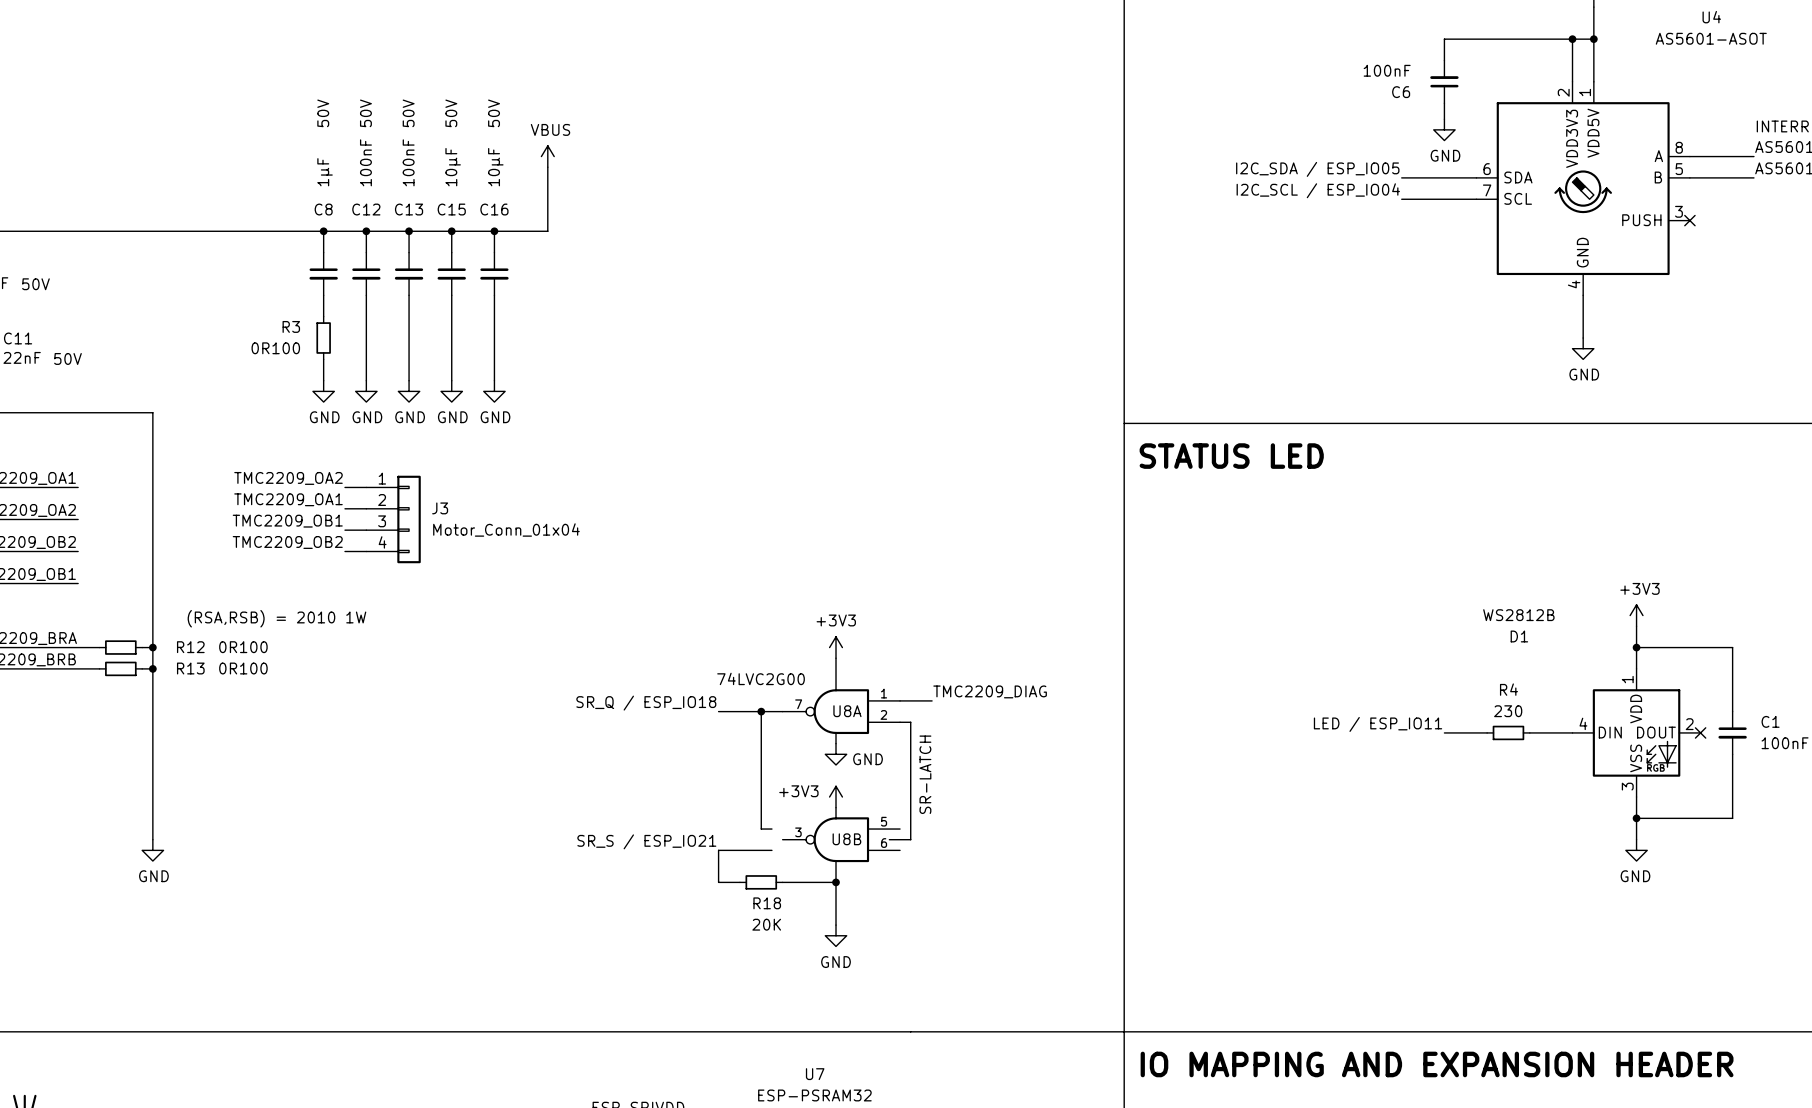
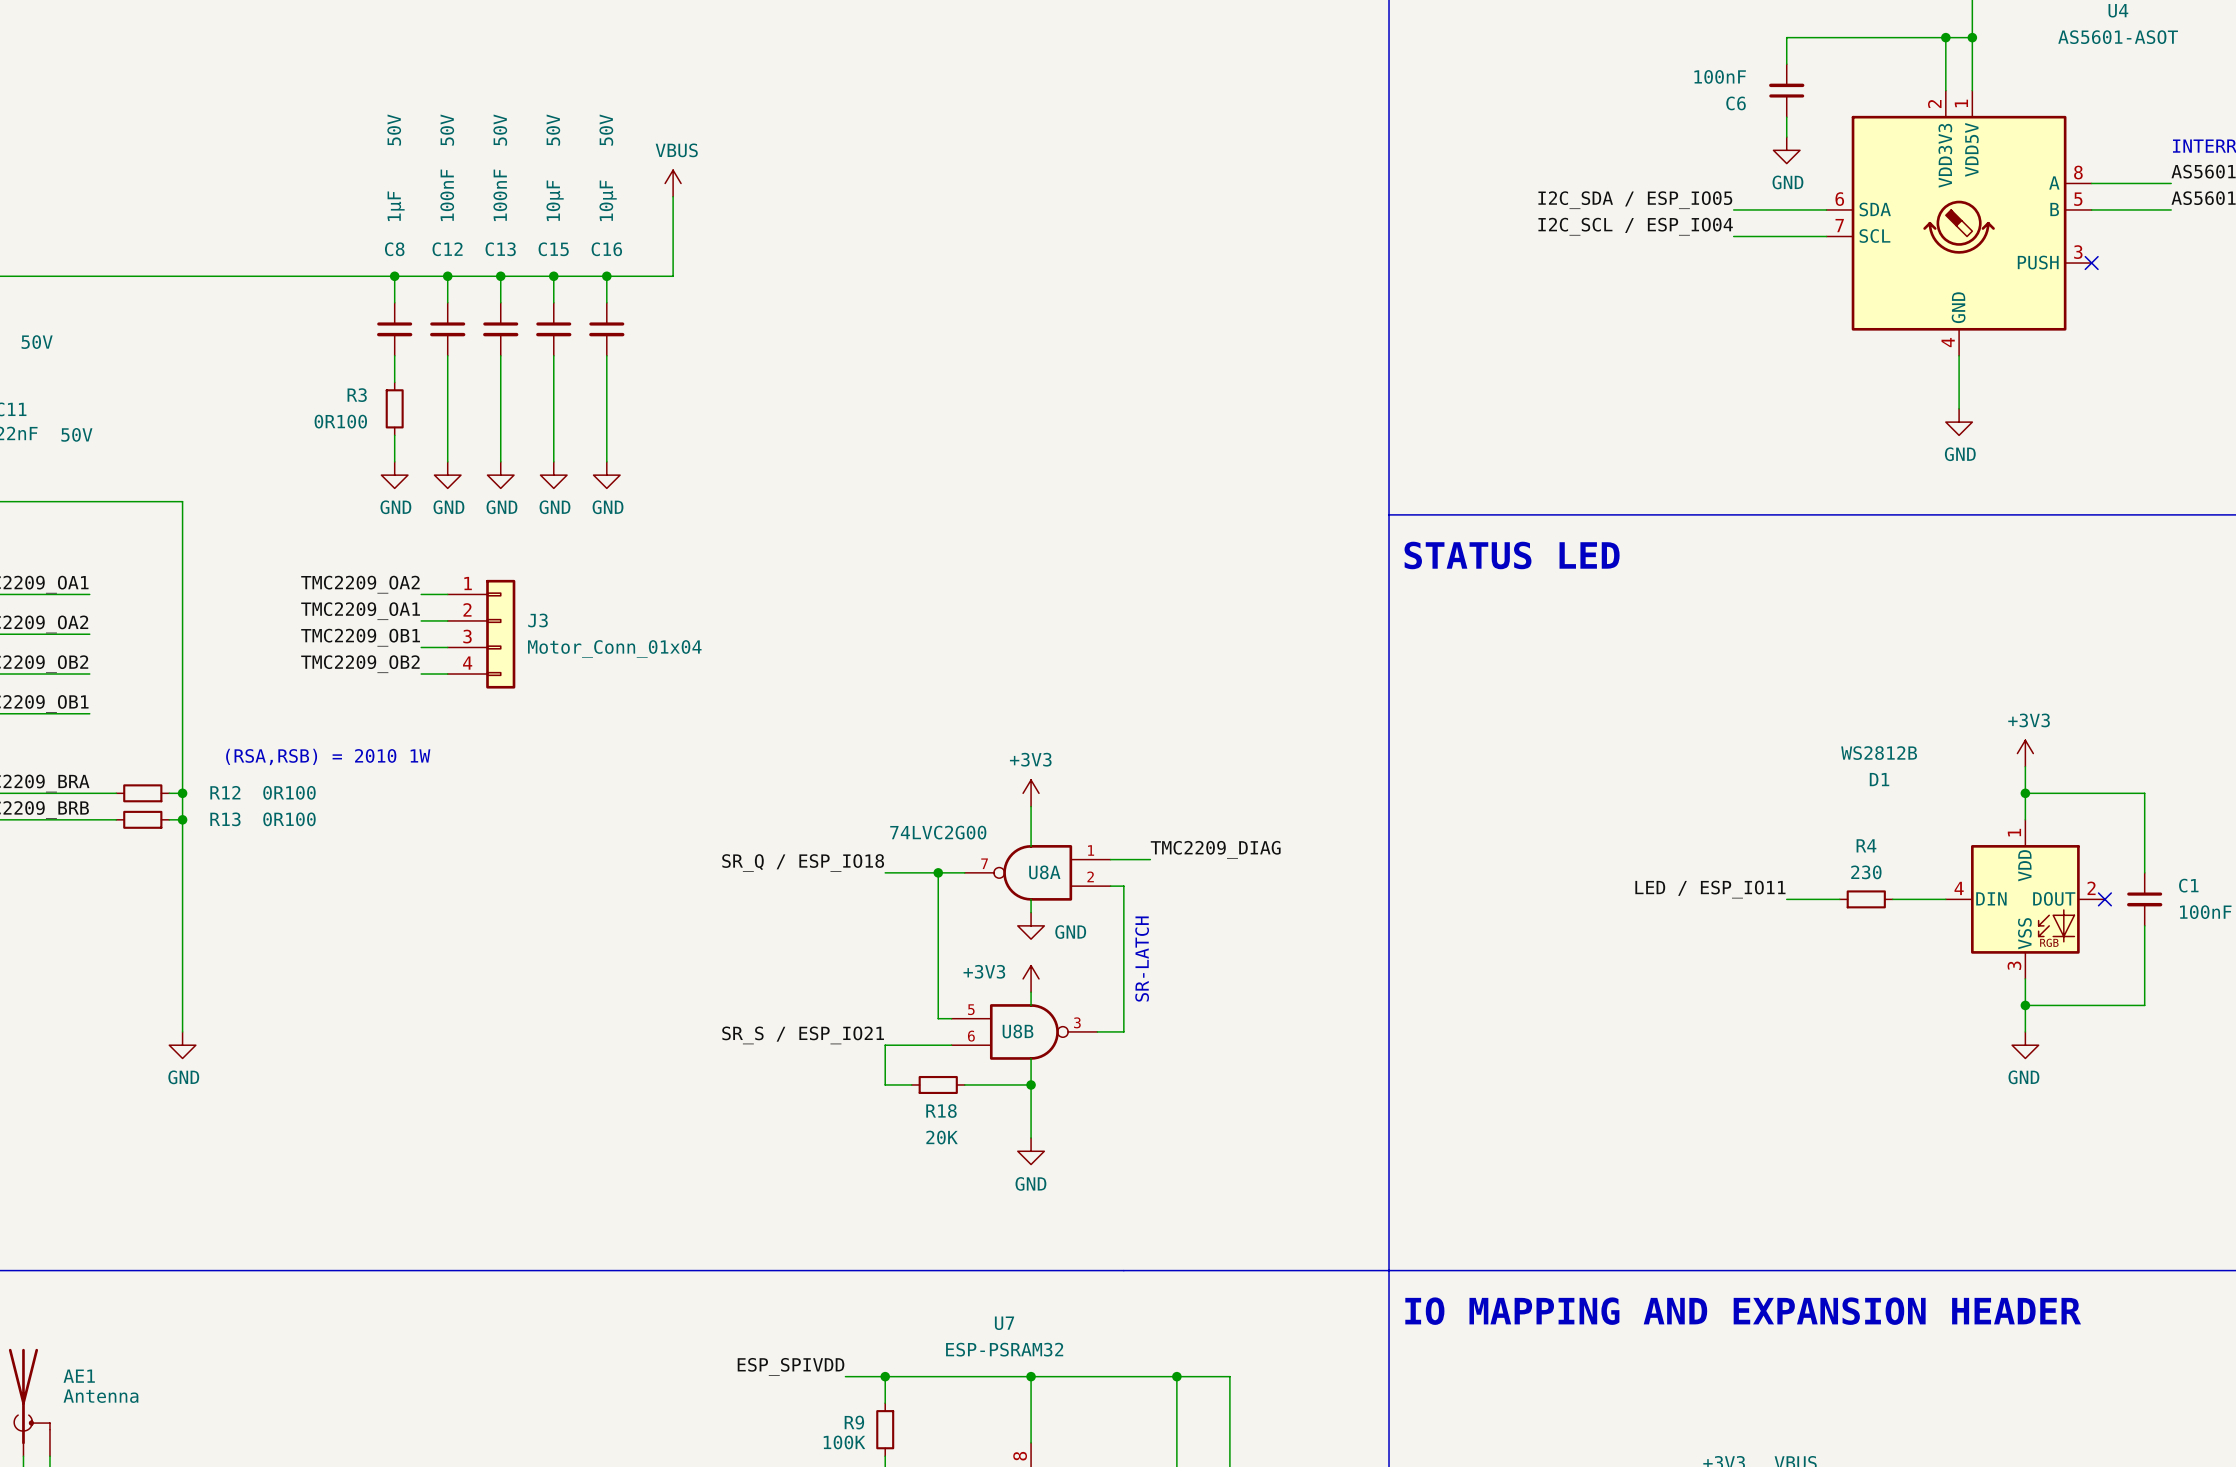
U8B flip: as is (841, 839) -> left-right (1024, 1031)

